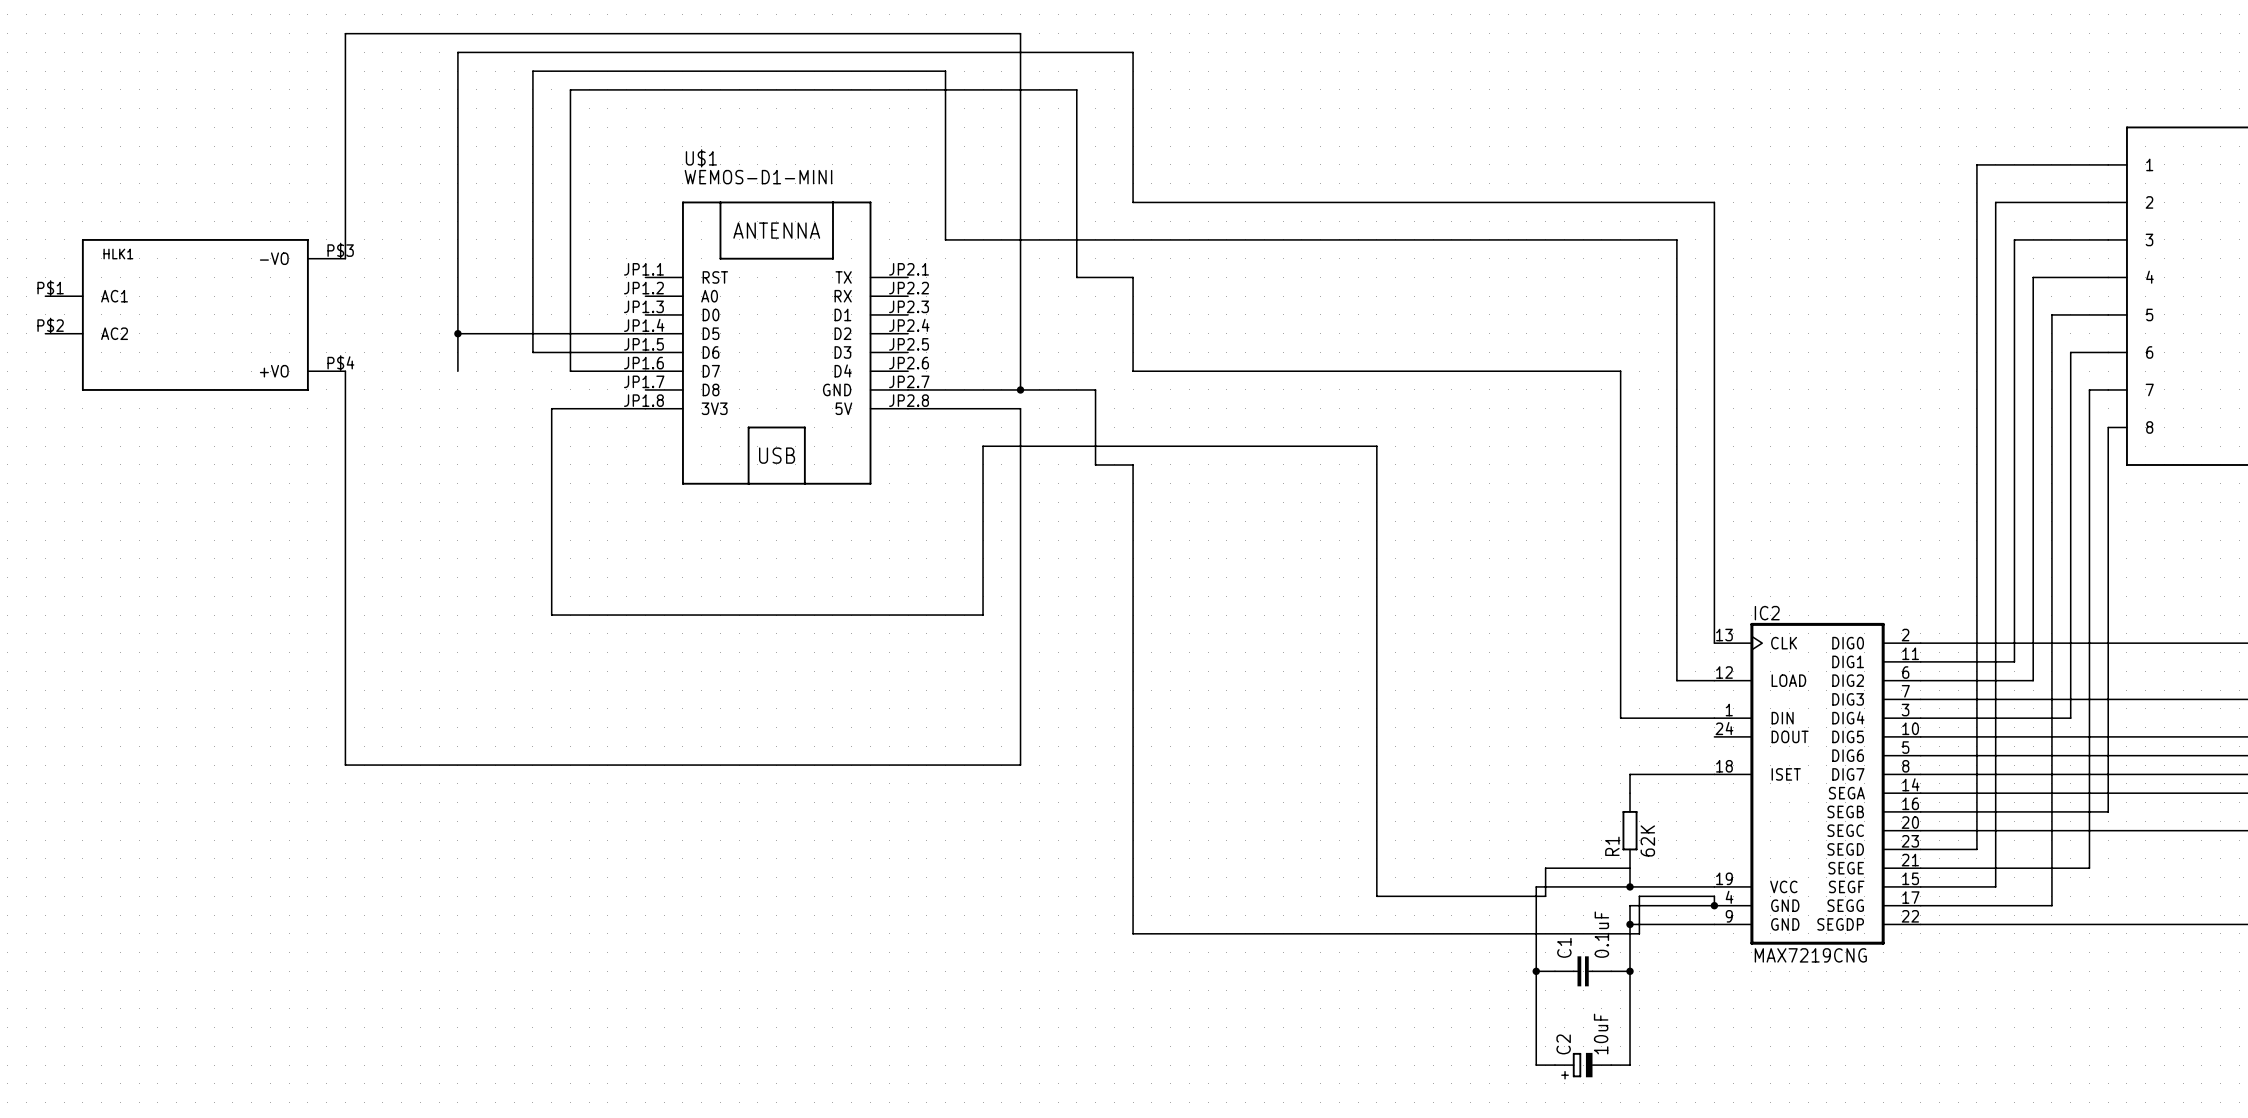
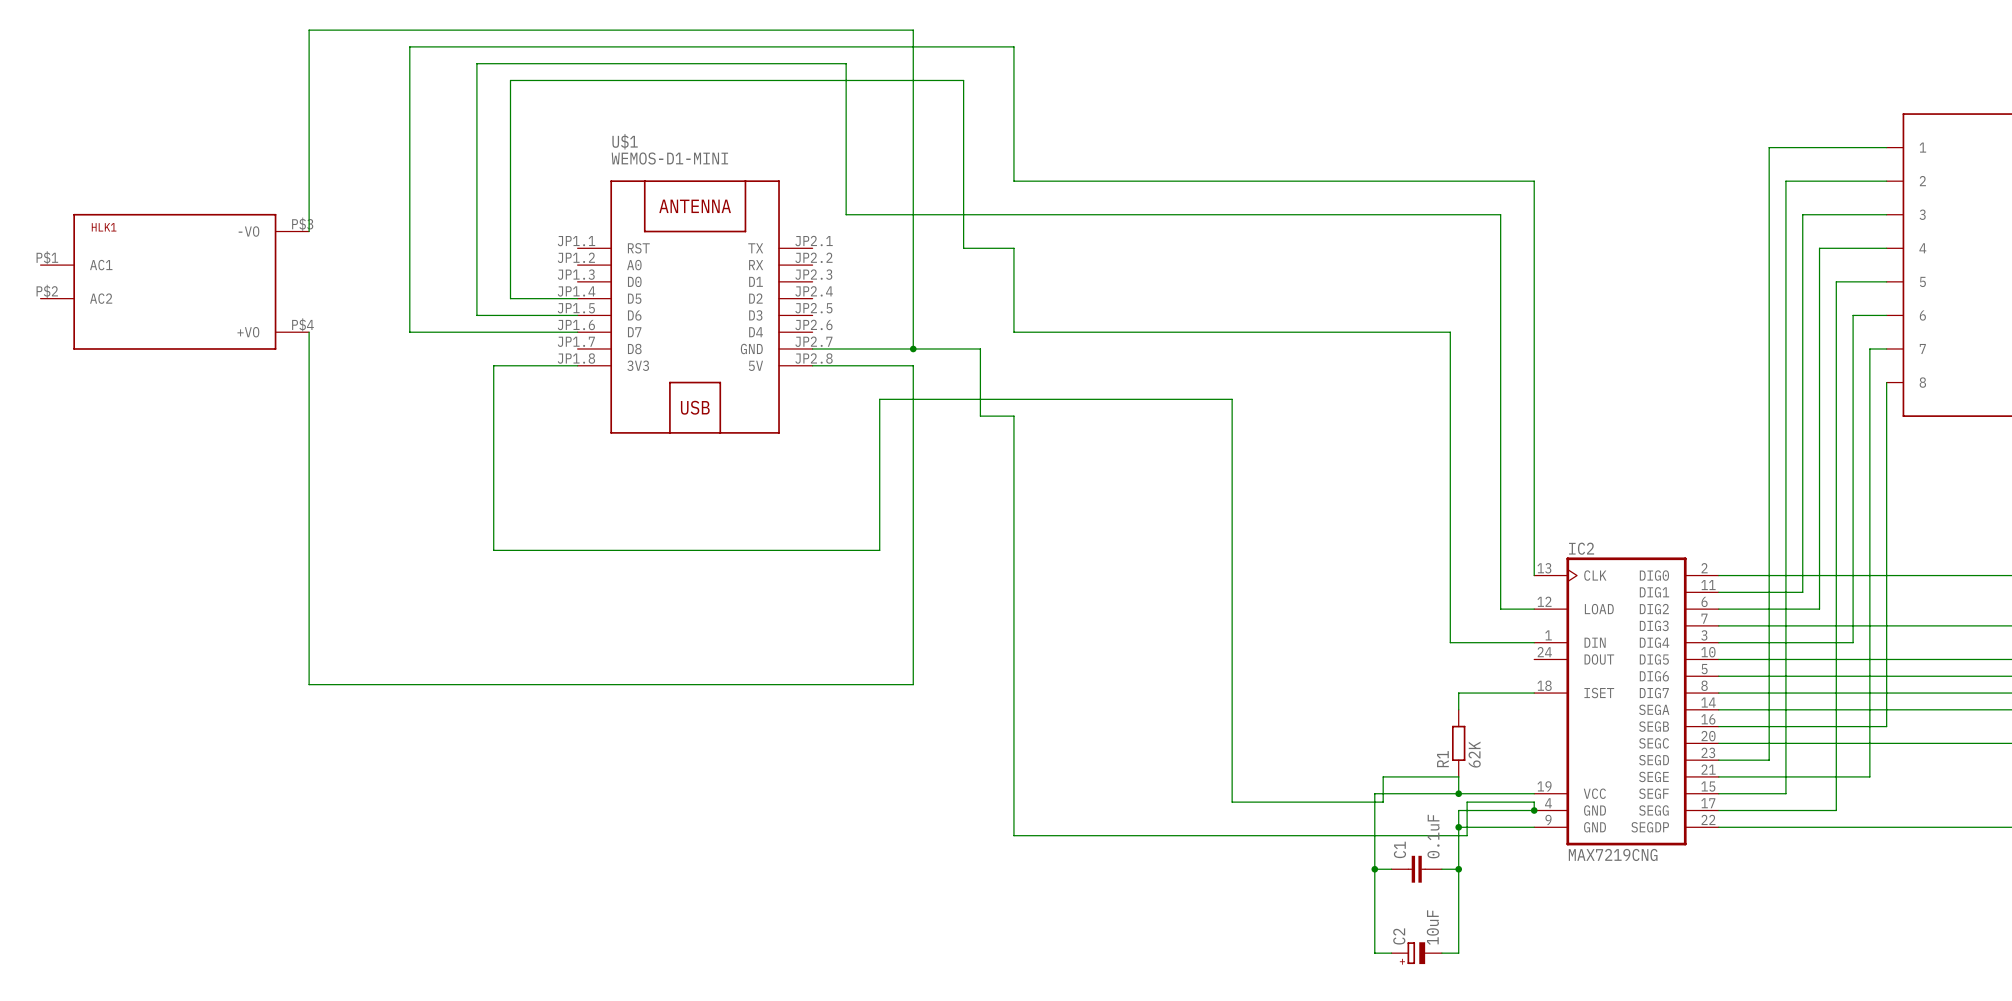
wire: (457, 333) (570, 333) (570, 371) -> (409, 332) (510, 332)
junction: (457, 333) -> none

